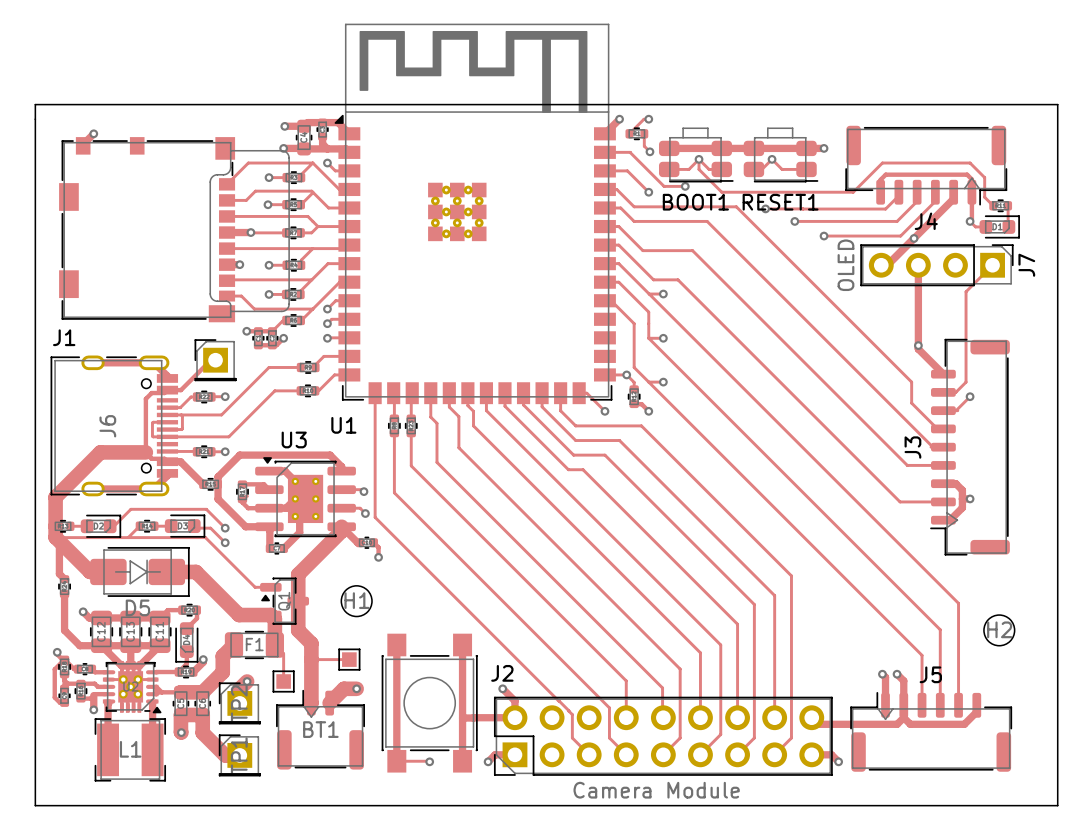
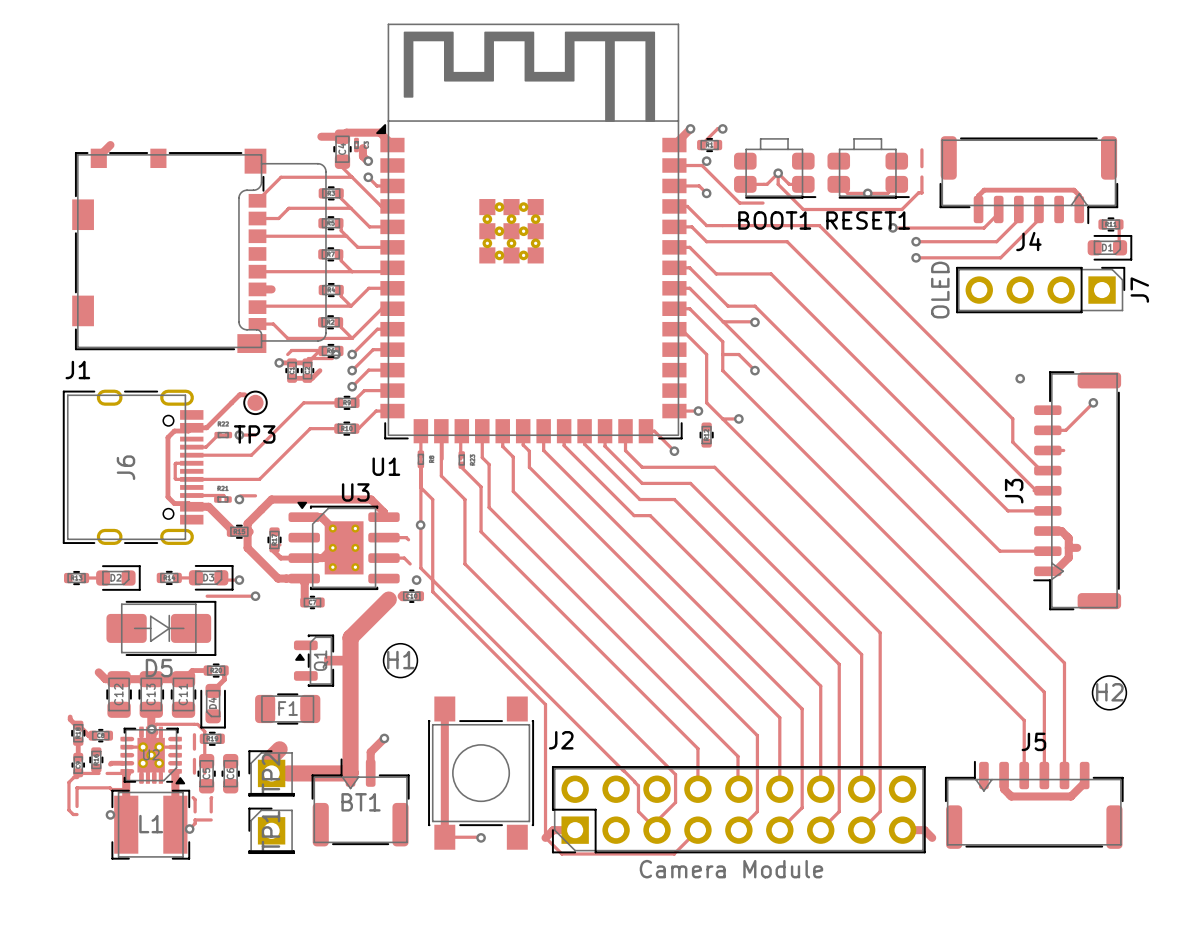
board edge: (35, 104) (35, 805) (1057, 805) (1057, 104) (35, 104) -> none
part footprint: [316, 118, 329, 141] -> [354, 137, 359, 153]
via: (284, 126) -> none
via: (93, 133) -> none
track: (644, 133) (644, 146) (649, 151) -> none
track: none -> (921, 149) (921, 166)
track: (283, 148) (345, 148) (349, 152) -> none
via: (283, 148) -> none
via: none -> (368, 161)
via: none -> (706, 161)
track: (669, 148) (824, 148) -> none
via: (824, 148) -> none
via: (649, 151) -> none
via: (772, 159) -> none
track: none -> (921, 176) (921, 192)
track: (312, 163) (301, 174) (301, 177) -> (352, 177) (341, 166) (341, 161)
track: (753, 169) (761, 169) (772, 159) (782, 169) (806, 169) -> (838, 184) (847, 193) (887, 193) (896, 184)
track: (269, 177) (286, 177) -> none
via: (269, 177) -> none
track: none -> (341, 193) (341, 198) (350, 208)
track: (634, 177) (648, 192) -> none
via: none -> (706, 193)
via: none -> (867, 193)
via: (685, 186) -> none
track: (312, 192) (301, 204) -> none
via: (648, 192) -> none
track: (811, 192) (853, 192) (882, 163) (970, 163) (984, 177) (984, 197) (993, 205) -> (901, 209) (918, 192) (921, 192)
track: (953, 192) (953, 198) (887, 265) (881, 265) -> none
track: (971, 192) (971, 219) (970, 221) (975, 226) (985, 226) -> none
via: (267, 204) -> none
track: (271, 204) (286, 204) -> none
track: none -> (341, 225) (341, 230) (346, 236)
track: (765, 208) (802, 208) -> none
via: (765, 208) -> none
via: none -> (892, 227)
track: (794, 221) (824, 221) -> none
via: (794, 221) -> none
via: none -> (916, 241)
via: (970, 221) -> none
track: (317, 226) (311, 232) (300, 232) -> none
track: (227, 232) (286, 232) -> none
via: (250, 232) -> none
via: (914, 238) -> none
track: (312, 248) (301, 260) (301, 265) -> (352, 271) (341, 260) (341, 257)
via: (239, 264) -> none
track: (269, 265) (286, 265) -> none
via: (269, 265) -> none
track: (918, 265) (918, 349) (943, 374) -> none
track: (992, 265) (966, 291) (966, 382) (955, 392) -> (1093, 402) (1065, 430) (1061, 430)
track: (311, 279) (300, 290) (300, 294) -> (351, 306) (341, 296) (341, 290)
track: (269, 294) (285, 294) -> none
via: (269, 294) -> none
track: none -> (738, 321) (754, 322)
via position: (663, 294) -> (754, 322)
track: (312, 309) (301, 320) -> (352, 338) (341, 327) (341, 322)
track: none -> (368, 338) (352, 354)
via: (327, 309) -> none
track: none -> (319, 350) (291, 350) (287, 354)
track: none -> (336, 354) (332, 358) (308, 358)
via: none -> (336, 354)
via: none -> (352, 354)
track: none -> (368, 354) (352, 370)
via: (327, 323) -> none
track: none -> (722, 354) (738, 354) (754, 370)
via: (283, 338) -> none
via: none -> (352, 370)
track: none -> (368, 370) (352, 386)
via: (327, 338) -> none
track: (648, 338) (663, 338) -> none
via position: (663, 338) -> (754, 370)
via: none -> (352, 386)
part: (215, 360) -> none
track: (93, 362) (154, 362) (167, 378) -> none
TP3: none -> (255, 402)
track: (626, 374) (634, 382) (634, 389) -> none
part footprint: [192, 390, 216, 404] -> [214, 431, 233, 439]
via position: (225, 396) -> (239, 435)
track: (970, 396) (956, 410) -> none
via position: (970, 396) -> (1093, 402)
track: (634, 404) (641, 404) (648, 411) -> none
via: (648, 411) -> none
track: (181, 414) (182, 428) (167, 429) -> none
part footprint: [387, 414, 401, 438] -> [417, 450, 425, 469]
part footprint: [404, 414, 418, 438] -> [458, 451, 465, 469]
track: none -> (420, 464) (420, 487) (432, 499) (432, 591) (545, 704) (545, 837) (561, 854) (674, 854)
track: (394, 433) (394, 492) (415, 513) -> (441, 431) (441, 475) (464, 499) (464, 563)
track: (411, 433) (411, 465) (429, 484) -> (461, 467) (481, 486) (481, 531)
U3 name position: U3 (294, 439) -> U3 (355, 492)
part footprint: [192, 445, 216, 459] -> [214, 496, 232, 503]
via position: (225, 451) -> (239, 499)
track: (145, 452) (100, 452) (55, 497) (55, 537) (90, 571) (108, 571) -> none
track: (180, 461) (203, 484) -> (206, 506) (208, 506) (233, 531) (249, 531)
track: (167, 473) (154, 489) (93, 489) -> none
track: (242, 484) (264, 484) (269, 489) -> none
via position: (363, 491) -> (420, 525)
via: (970, 498) -> none
via: (365, 513) -> none
track: (295, 516) (299, 520) (299, 532) (283, 548) -> none
track: (110, 526) (113, 526) (130, 509) (206, 509) (225, 528) -> none
track: (139, 526) (128, 537) -> none
track: (210, 528) (225, 542) -> (207, 596) (255, 596)
via position: (225, 528) -> (239, 580)
via: none -> (416, 580)
track: (357, 542) (341, 526) (341, 531) (298, 574) (298, 630) (311, 643) -> (388, 599) (350, 637) (350, 707)
track: (373, 542) (378, 547) (378, 557) -> none
via: (378, 557) -> none
track: (166, 571) (196, 571) (239, 615) (270, 615) (274, 619) (274, 644) (283, 653) (283, 681) -> none
track: (64, 579) (59, 573) (59, 537) (205, 537) (255, 587) (270, 587) -> none
part: (64, 586) -> none
track: (64, 594) (64, 630) (79, 645) (159, 645) -> none
via: (83, 611) -> none
track: (233, 644) (222, 656) (222, 672) (202, 692) (158, 692) (156, 694) (156, 686) (161, 692) -> none
track: (462, 644) (462, 761) -> none
track: (101, 645) (121, 666) (139, 666) (159, 645) -> none
track: (186, 651) (186, 663) (178, 672) (156, 672) -> none
via: (57, 652) -> none
track: none -> (194, 724) (156, 724) (151, 729) (151, 741)
track: none -> (194, 724) (197, 724) (204, 731) (204, 773)
track: (64, 659) (54, 669) (54, 697) (60, 702) (64, 702) -> none
track: (203, 659) (203, 662) (193, 672) -> none
via: (203, 659) -> none
track: (311, 659) (349, 659) -> none
part: (349, 659) -> none
via: none -> (151, 729)
track: none -> (194, 734) (194, 749)
track: (91, 669) (95, 672) (104, 672) -> none
track: (882, 674) (885, 677) (885, 705) -> none
via: (882, 674) -> none
track: (897, 674) (903, 680) (903, 705) -> none
via: (897, 674) -> none
track: (64, 680) (67, 683) (94, 683) (97, 686) (104, 686) -> none
via: (247, 681) -> none
part: (283, 681) -> none
track: (356, 688) (343, 688) (329, 703) -> (384, 738) (370, 752) (370, 773)
via position: (356, 688) -> (384, 738)
track: (502, 688) (514, 701) (514, 717) (462, 718) -> none
via: (502, 688) -> none
track: none -> (194, 759) (194, 773)
track: (80, 698) (90, 698) (93, 695) (93, 709) -> none
track: none -> (99, 773) (81, 773) (68, 782) (68, 810) (73, 814) (77, 814)
track: none -> (107, 773) (122, 773)
track: none -> (287, 773) (350, 773)
track: (605, 704) (609, 707) (609, 738) (626, 754) -> (675, 774) (675, 802) (657, 821)
via: (93, 709) -> none
track: none -> (77, 787) (77, 806)
track: none -> (77, 787) (127, 789)
track: (811, 717) (818, 724) (897, 724) (903, 717) -> none
track: none -> (193, 797) (195, 799) (195, 811)
track: none -> (211, 797) (211, 811)
track: (181, 732) (180, 714) (202, 714) (202, 732) (225, 755) (239, 755) -> none
via position: (181, 732) -> (189, 829)
via: none -> (110, 814)
track: none -> (211, 819) (195, 819) (195, 823) (189, 829)
track: none -> (697, 830) (674, 853)
via: (488, 761) -> none
via: (838, 761) -> none

